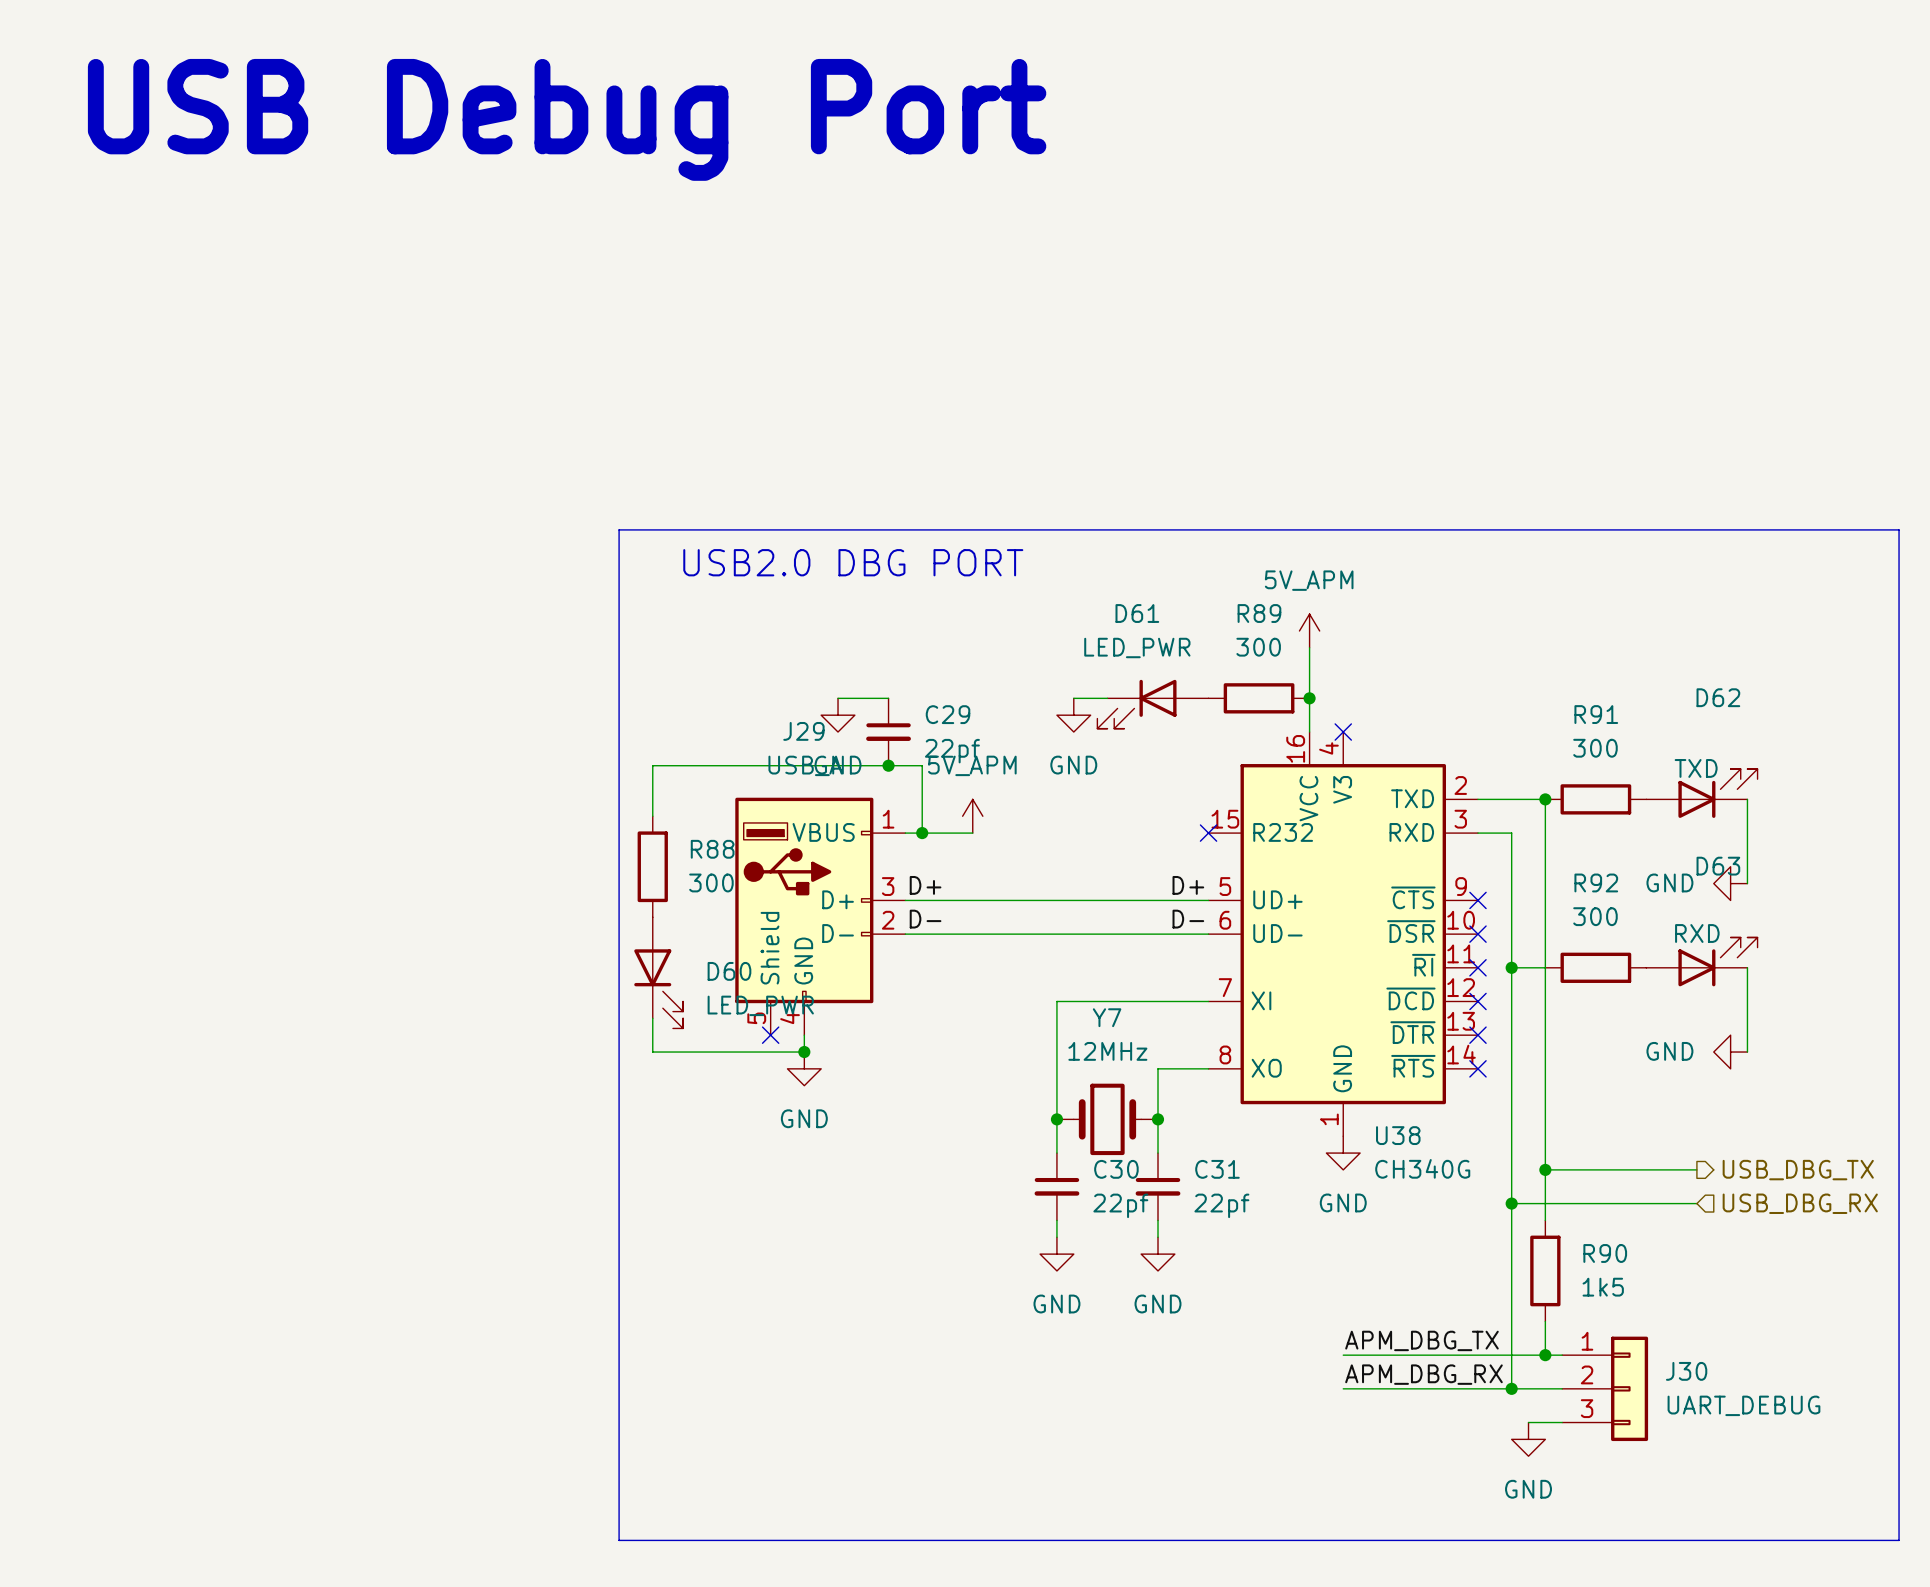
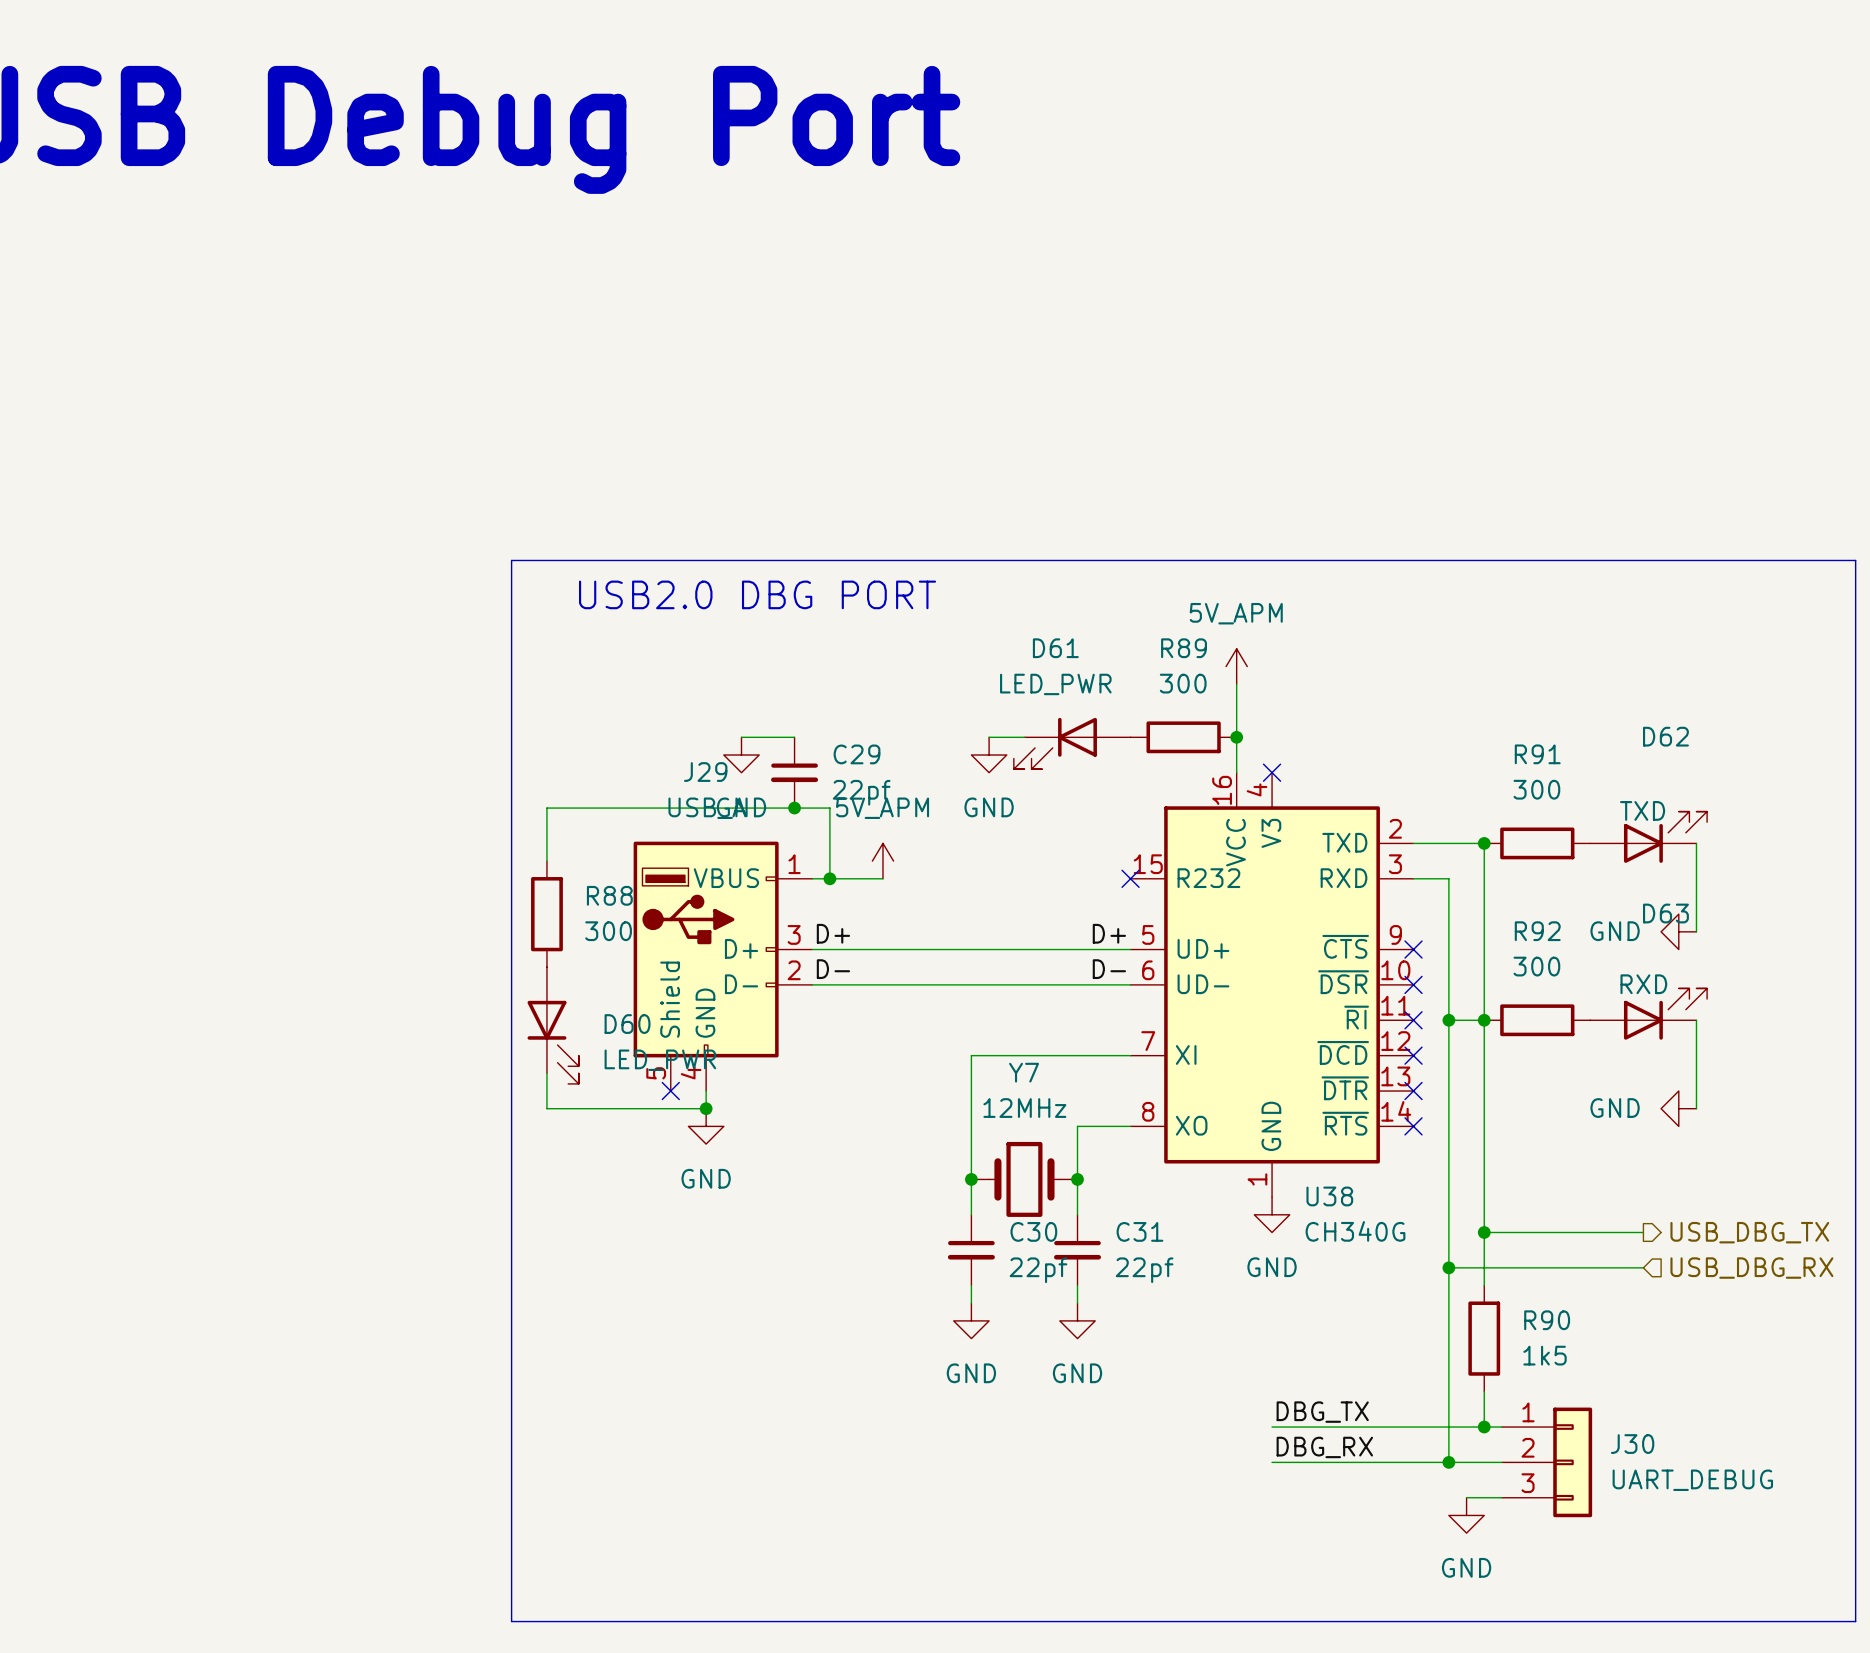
junction: none -> (1484, 1020)
label: APM_DBG_TX (1421, 1340) -> DBG_TX (1322, 1412)
label: APM_DBG_RX (1423, 1374) -> DBG_RX (1324, 1447)

